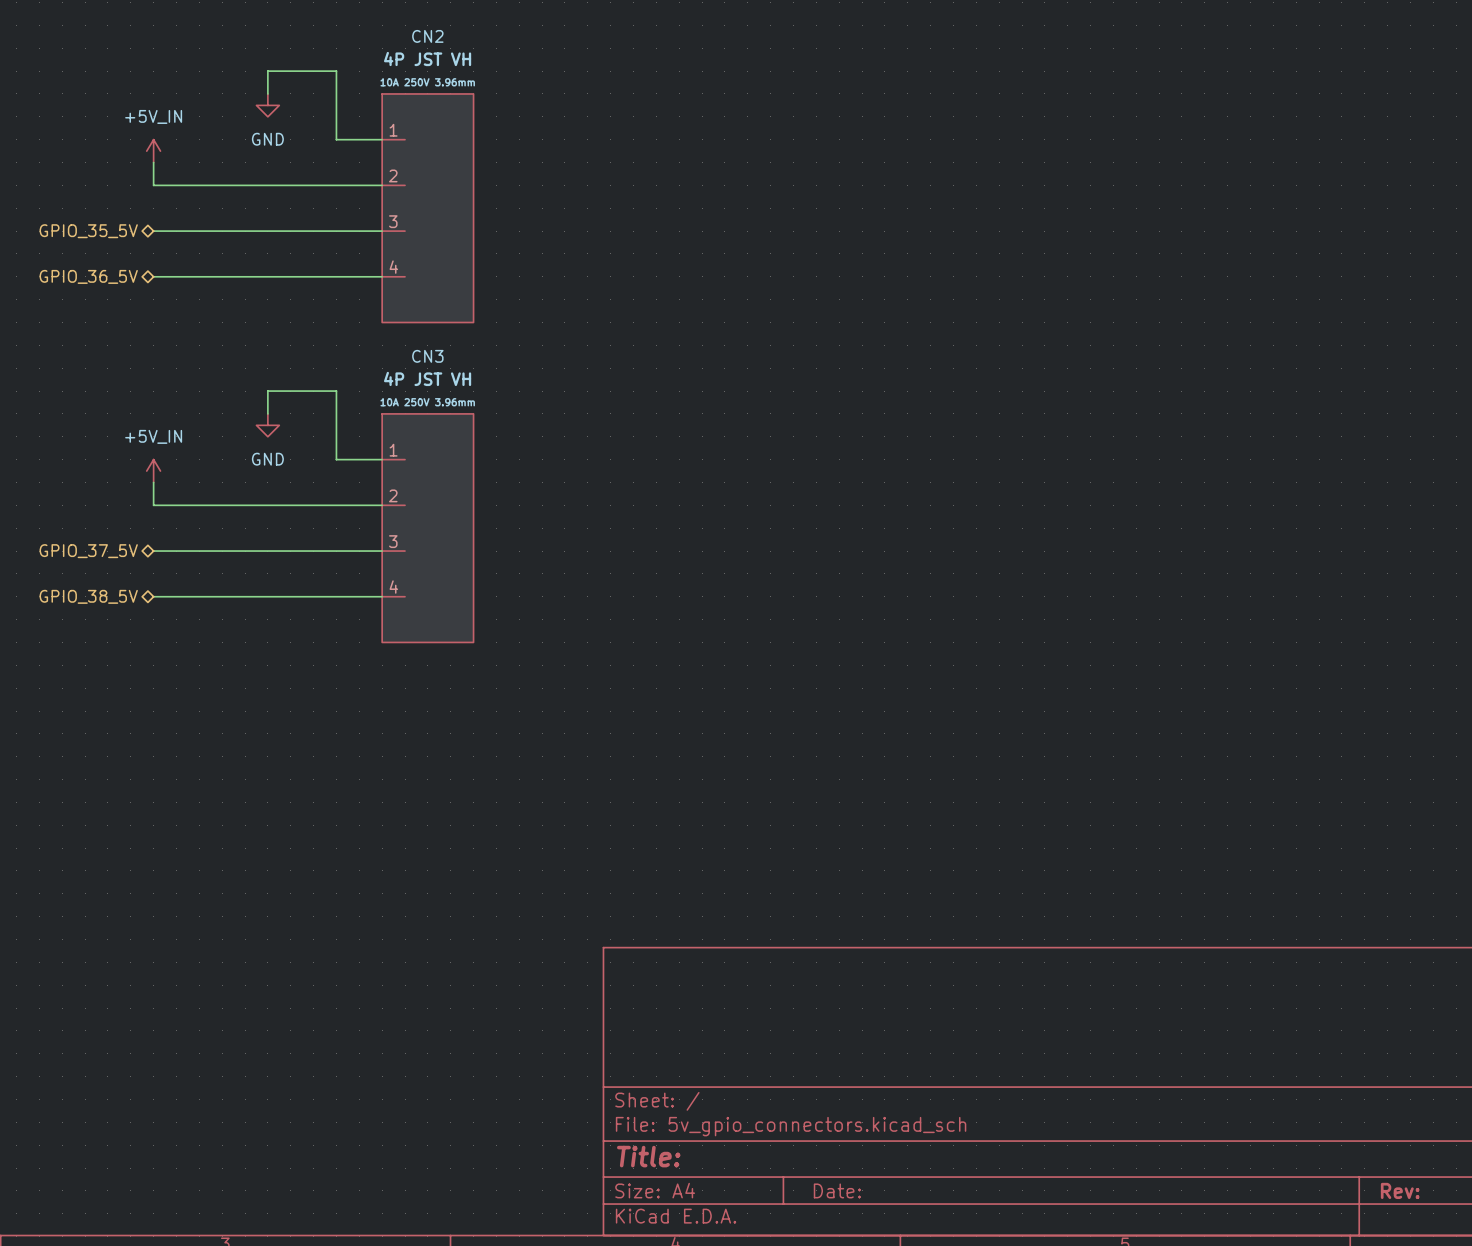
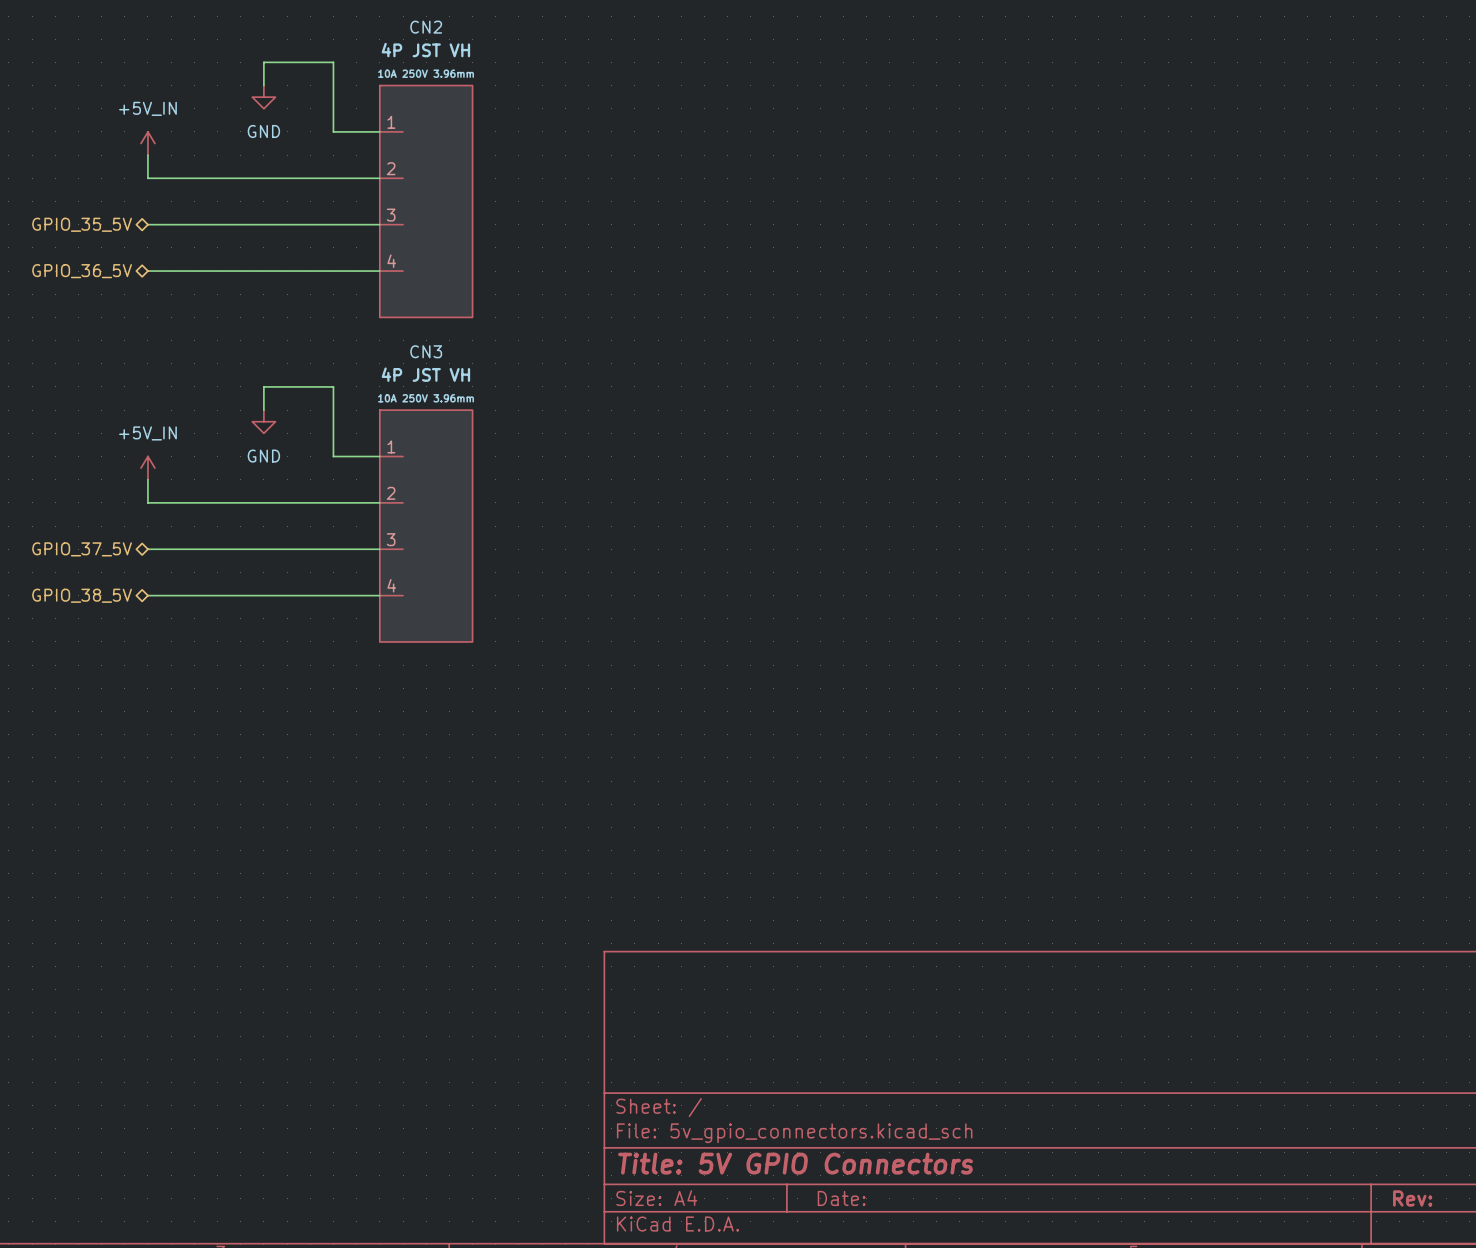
title block: Title: (648, 1156) -> Title: 5V GPIO Connectors (795, 1163)

